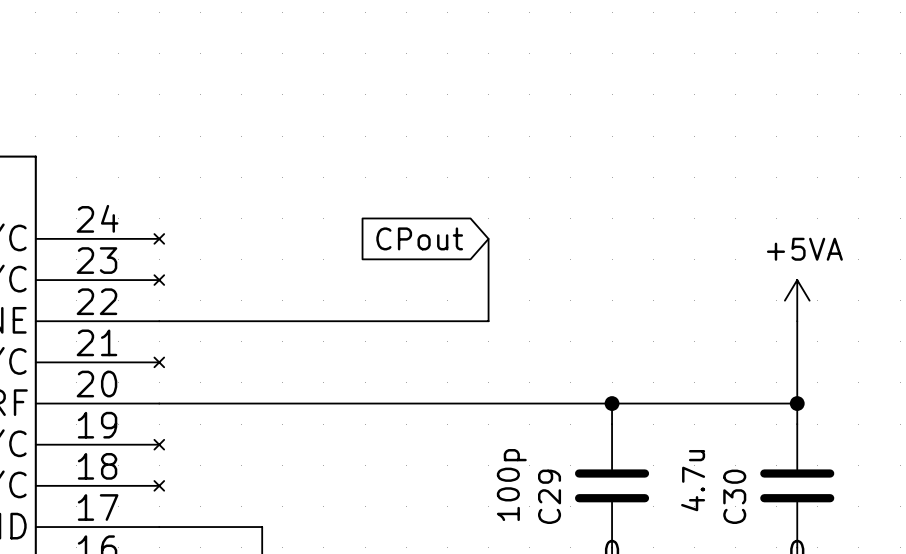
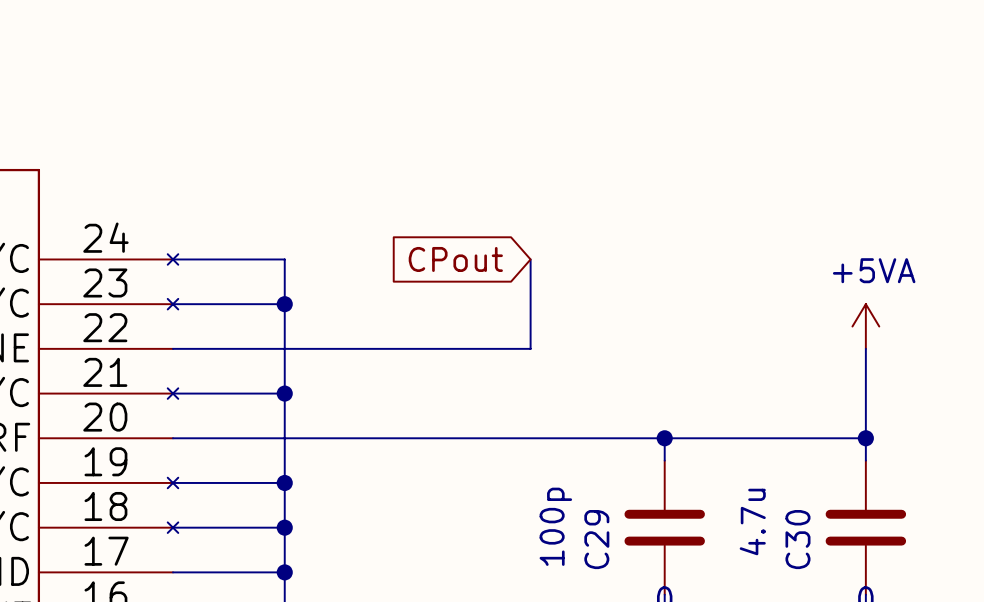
wire: none -> (173, 259) (284, 259) (284, 572)
wire: none -> (173, 304) (284, 304)
junction: none -> (284, 304)
wire: none -> (173, 393) (284, 393)
junction: none -> (284, 393)
wire: none -> (173, 482) (284, 482)
junction: none -> (284, 482)
wire: none -> (173, 527) (284, 527)
junction: none -> (284, 527)
junction: none -> (284, 572)

